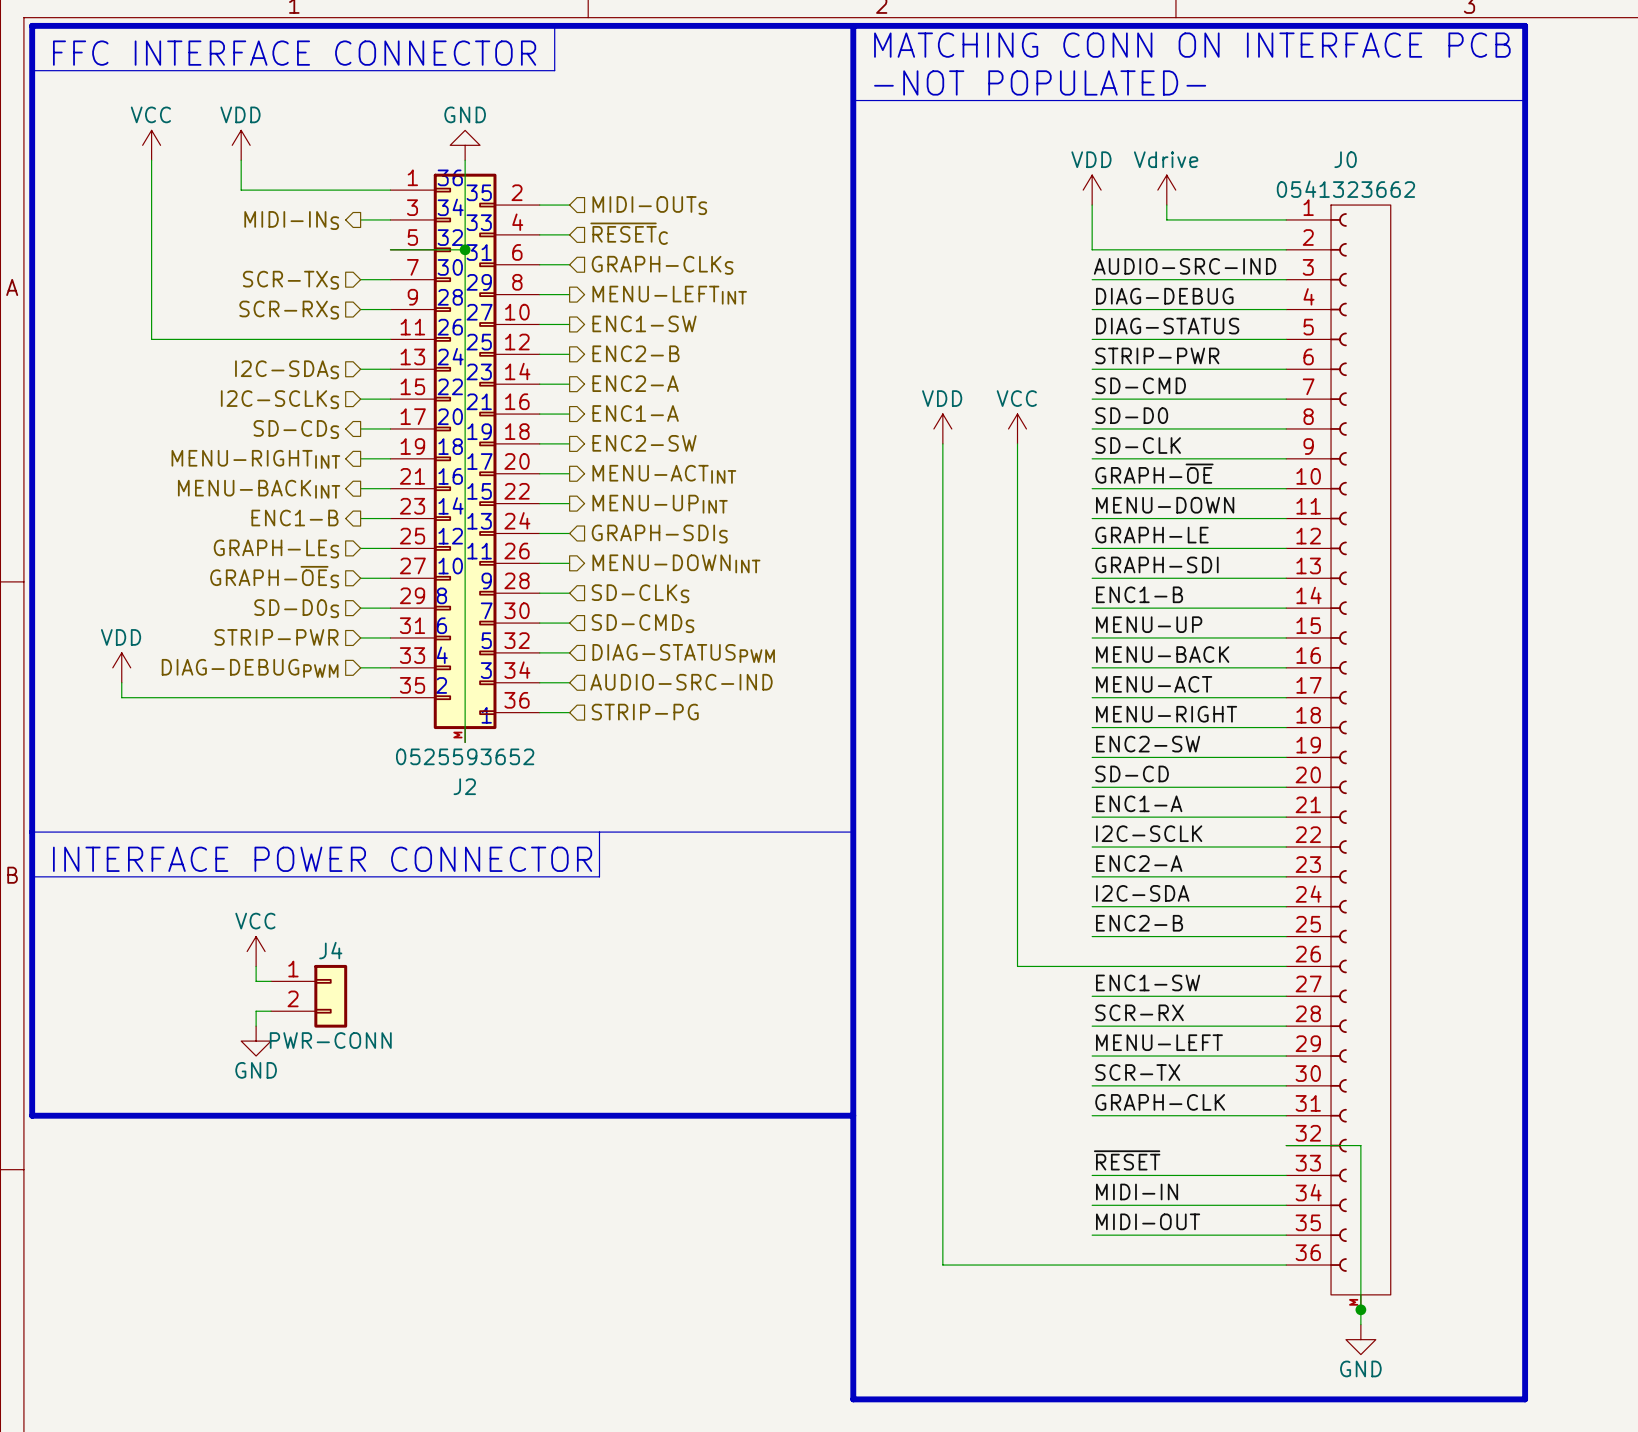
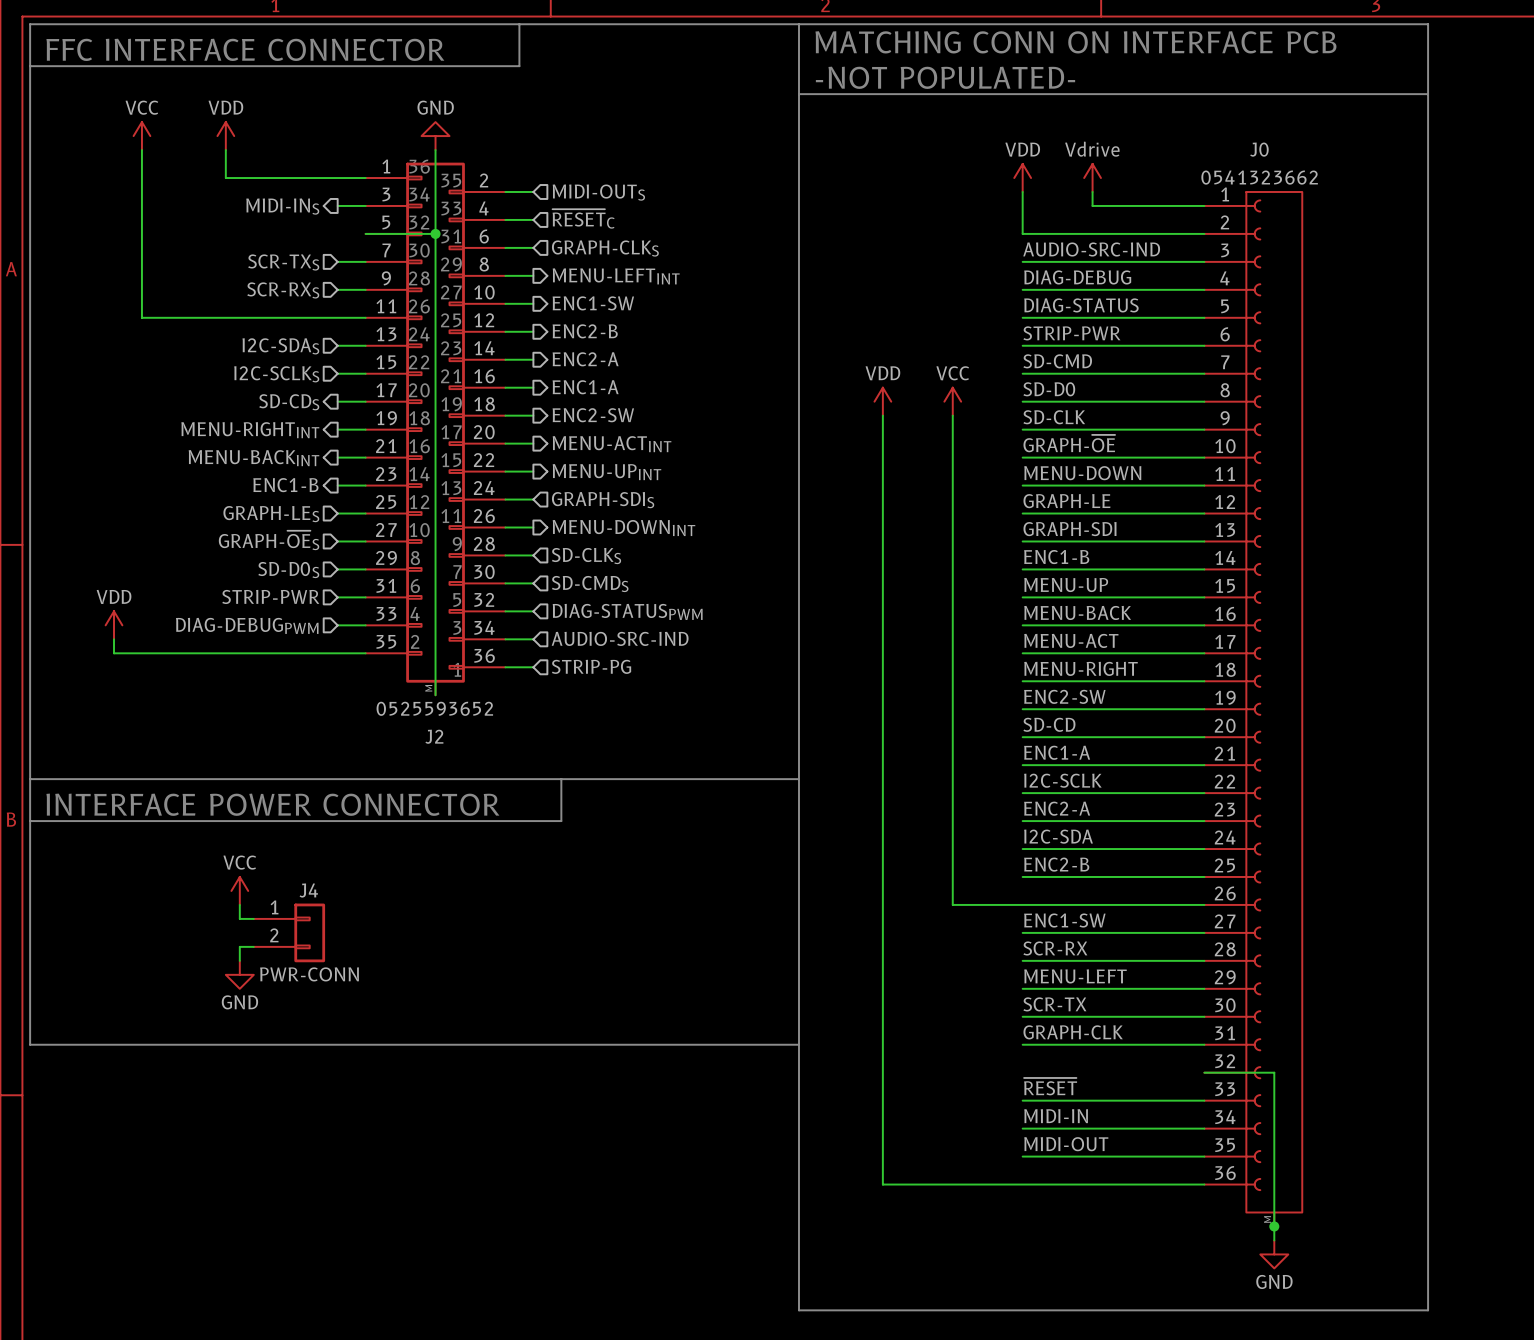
line width: thick (853, 25) (853, 1399) (1525, 1399) (1525, 25) (32, 25) (32, 1115) (853, 1115) -> thin (799, 24) (799, 1310) (1428, 1310) (1428, 24) (30, 24) (30, 1044) (799, 1044)

